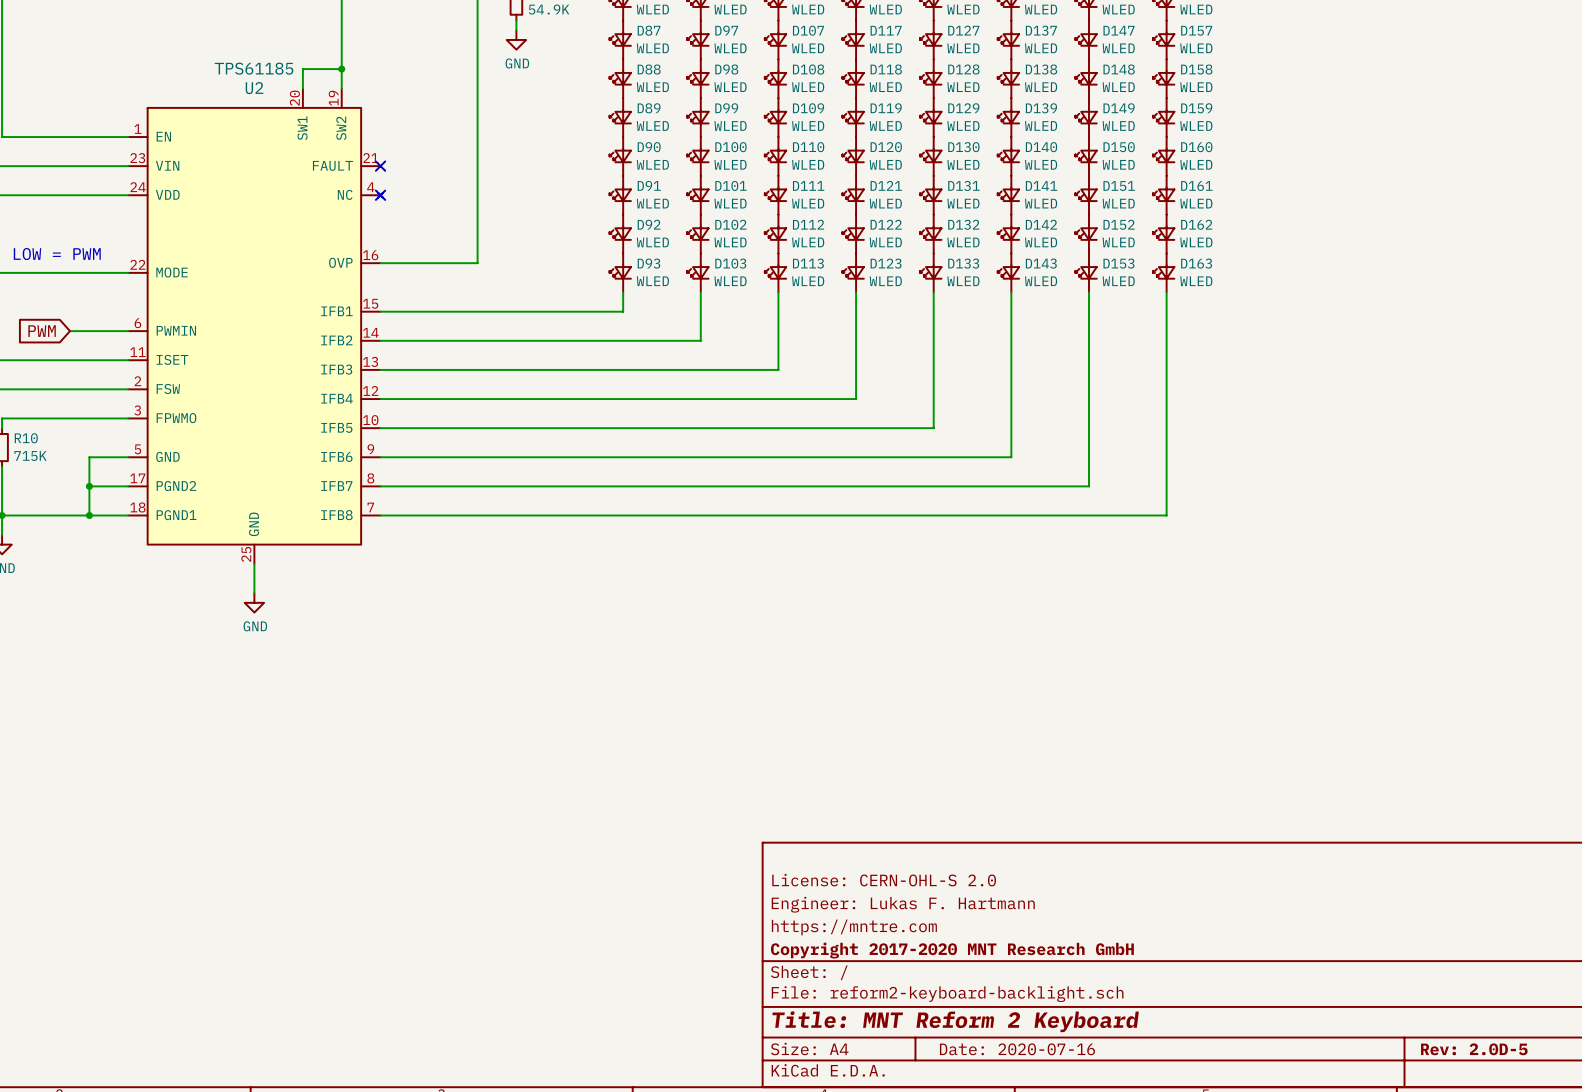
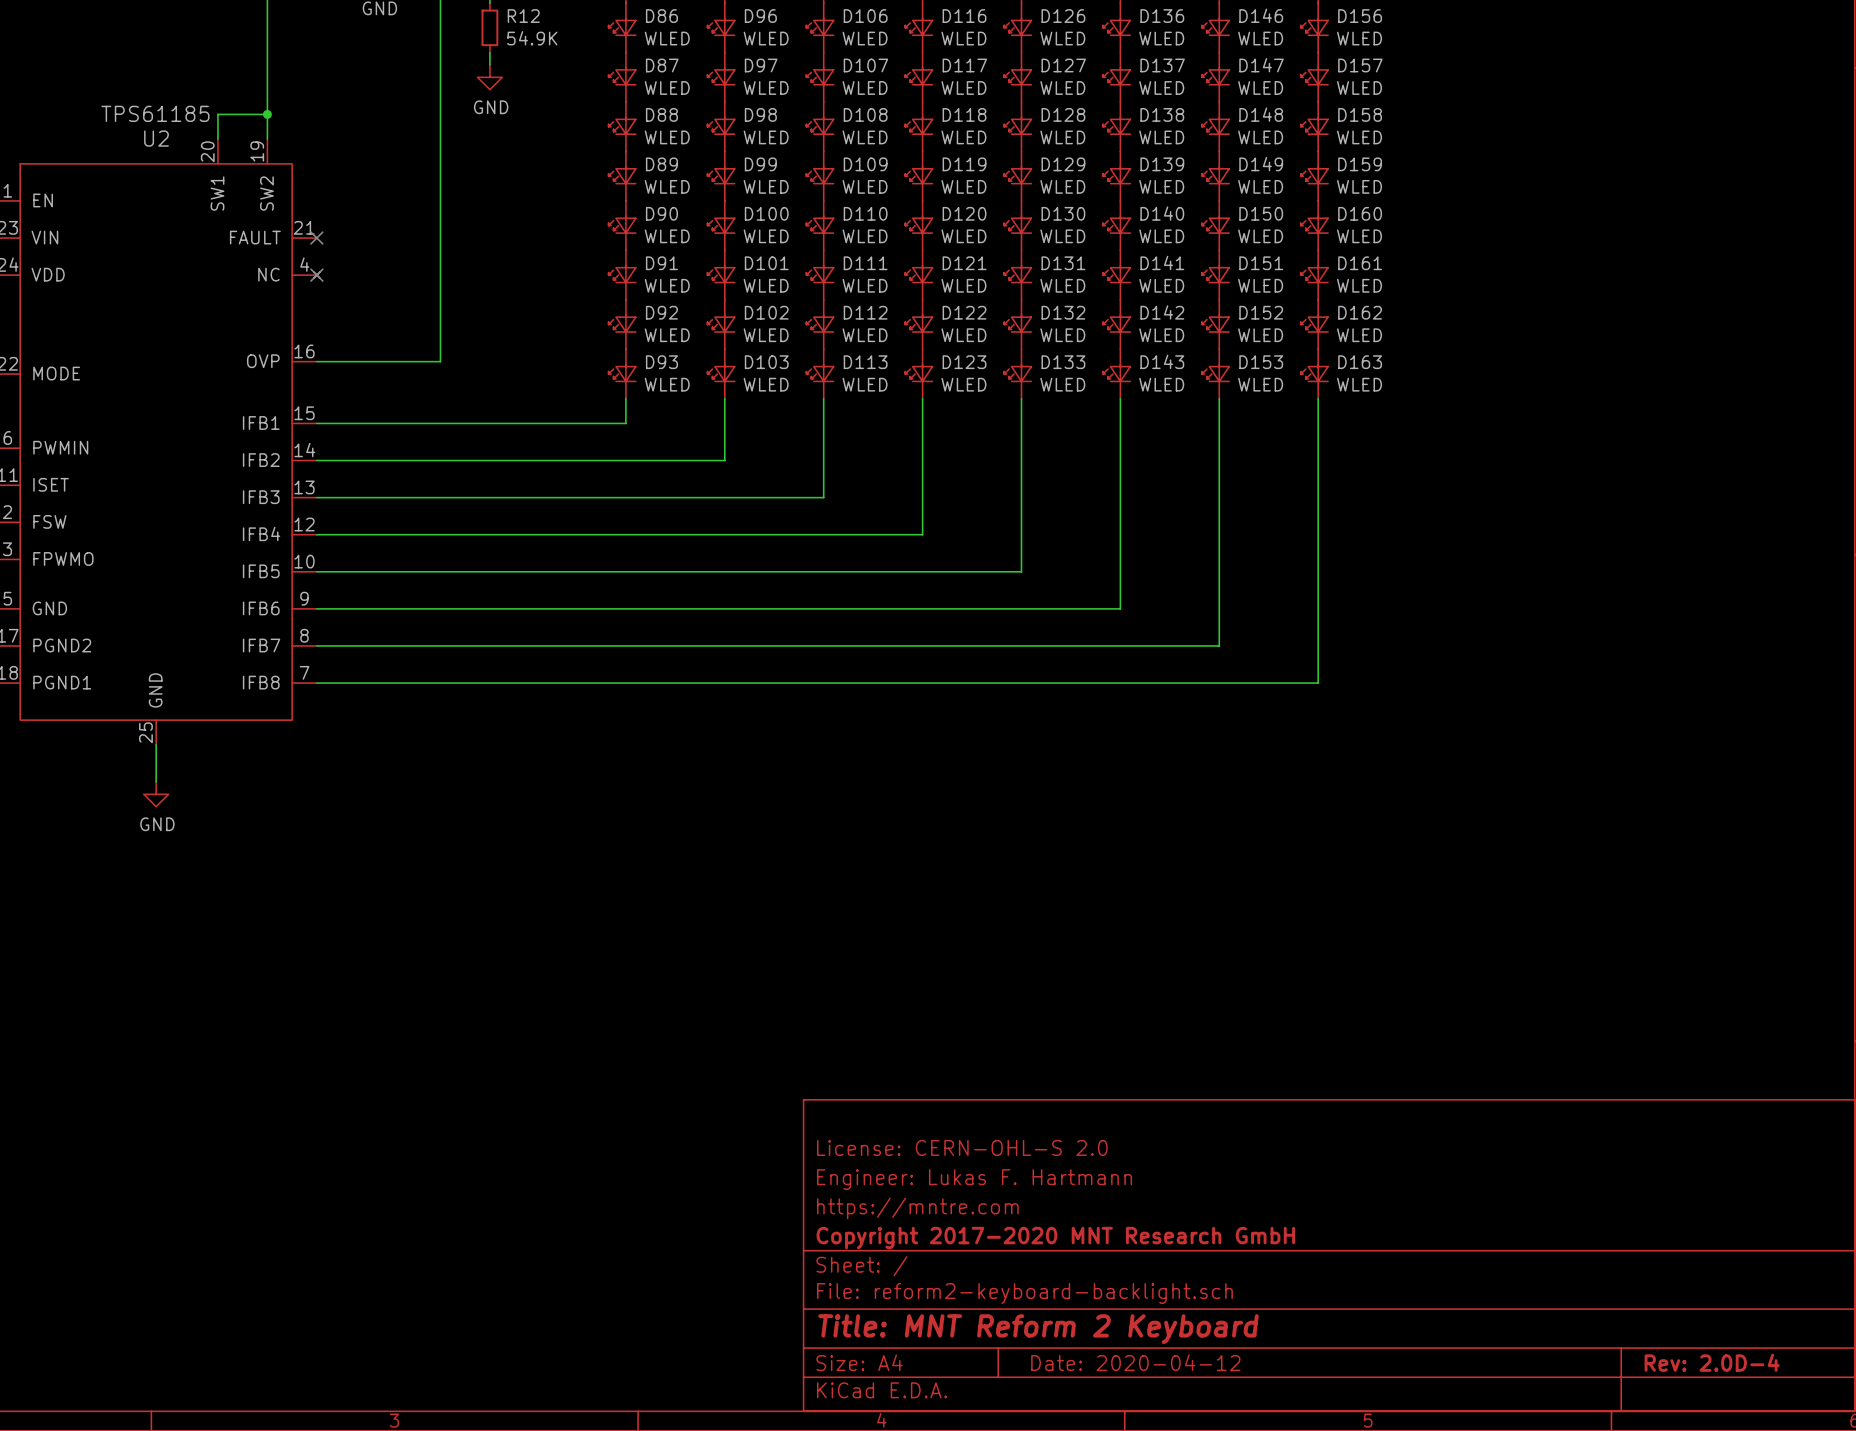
title block: Date: 2020-07-16 (1017, 1049) -> Date: 2020-04-12 (1135, 1362)
title block: Rev: 2.0D-5 (1474, 1049) -> Rev: 2.0D-4 (1712, 1362)

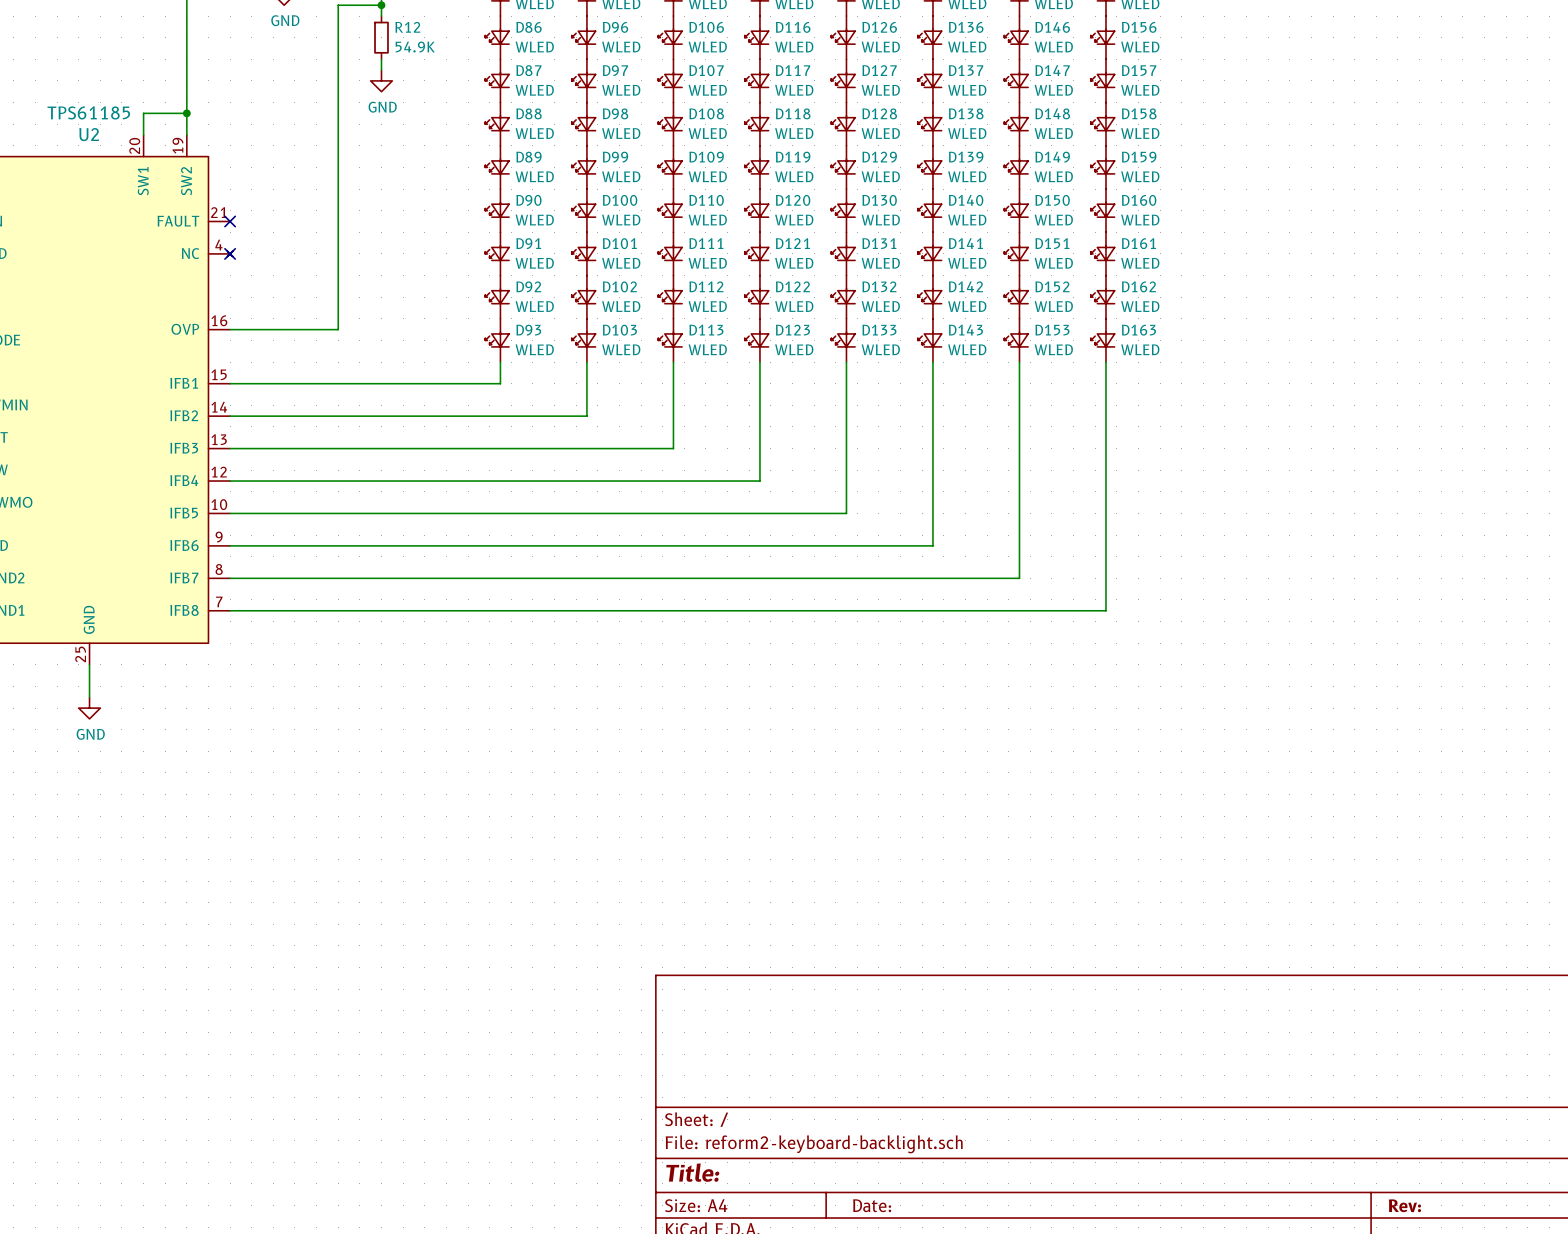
title block: License: CERN-OHL-S 2.0 (962, 1147) -> none
title block: Engineer: Lukas F. Hartmann (974, 1179) -> none
title block: https://mntre.com (917, 1208) -> none
title block: Copyright 2017-2020 MNT Research GmbH (1055, 1238) -> none
title block: Title: MNT Reform 2 Keyboard (1038, 1329) -> Title: (692, 1172)
title block: Date: 2020-04-12 (1135, 1362) -> Date: (872, 1205)
title block: Rev: 2.0D-4 (1712, 1362) -> Rev: (1404, 1205)

